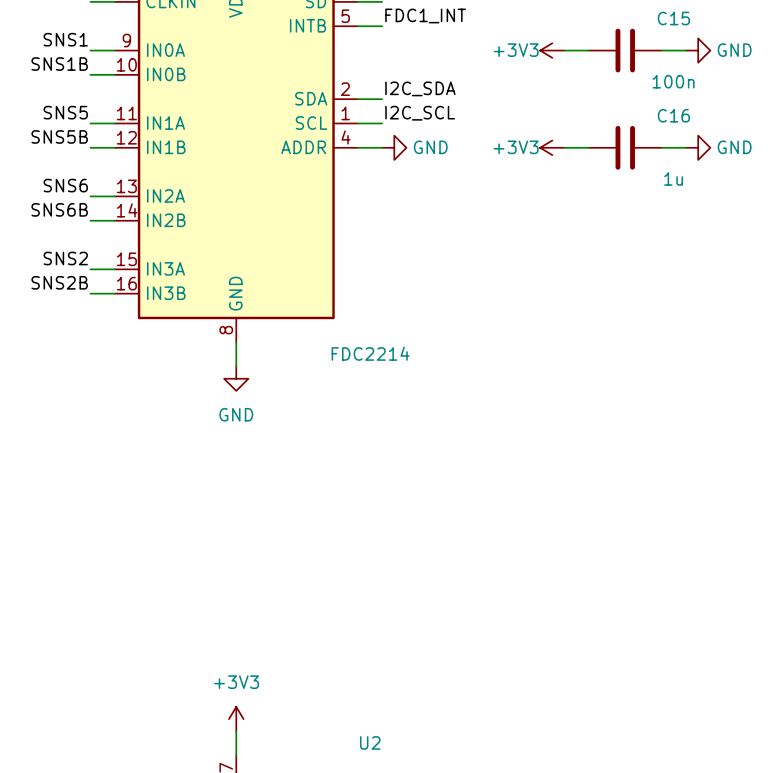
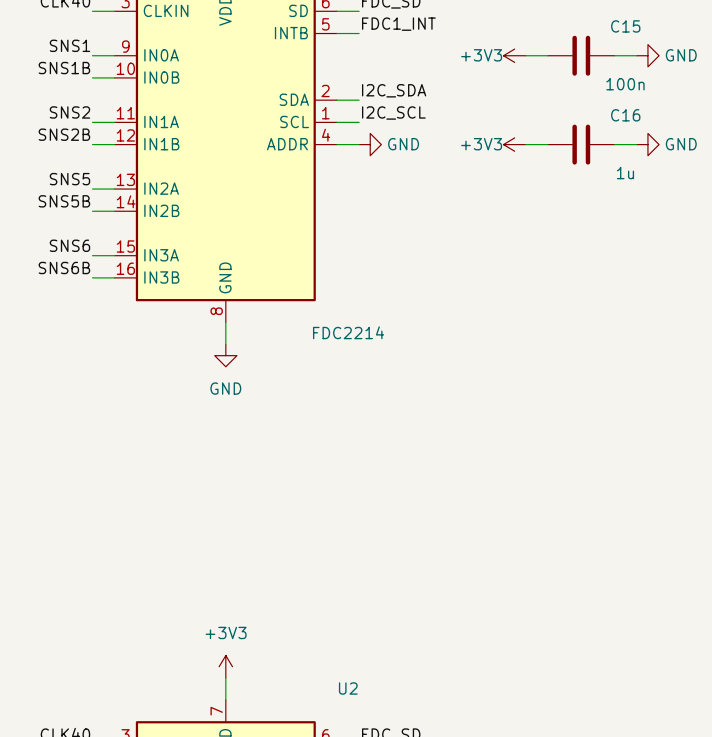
label: SNS5 (65, 112) -> SNS2 (69, 112)
label: SNS5B (59, 136) -> SNS2B (64, 134)
label: SNS6 (65, 185) -> SNS5 (69, 179)
label: SNS6B (59, 209) -> SNS5B (64, 201)
label: SNS2 (65, 258) -> SNS6 (69, 245)
label: SNS2B (59, 282) -> SNS6B (64, 267)

